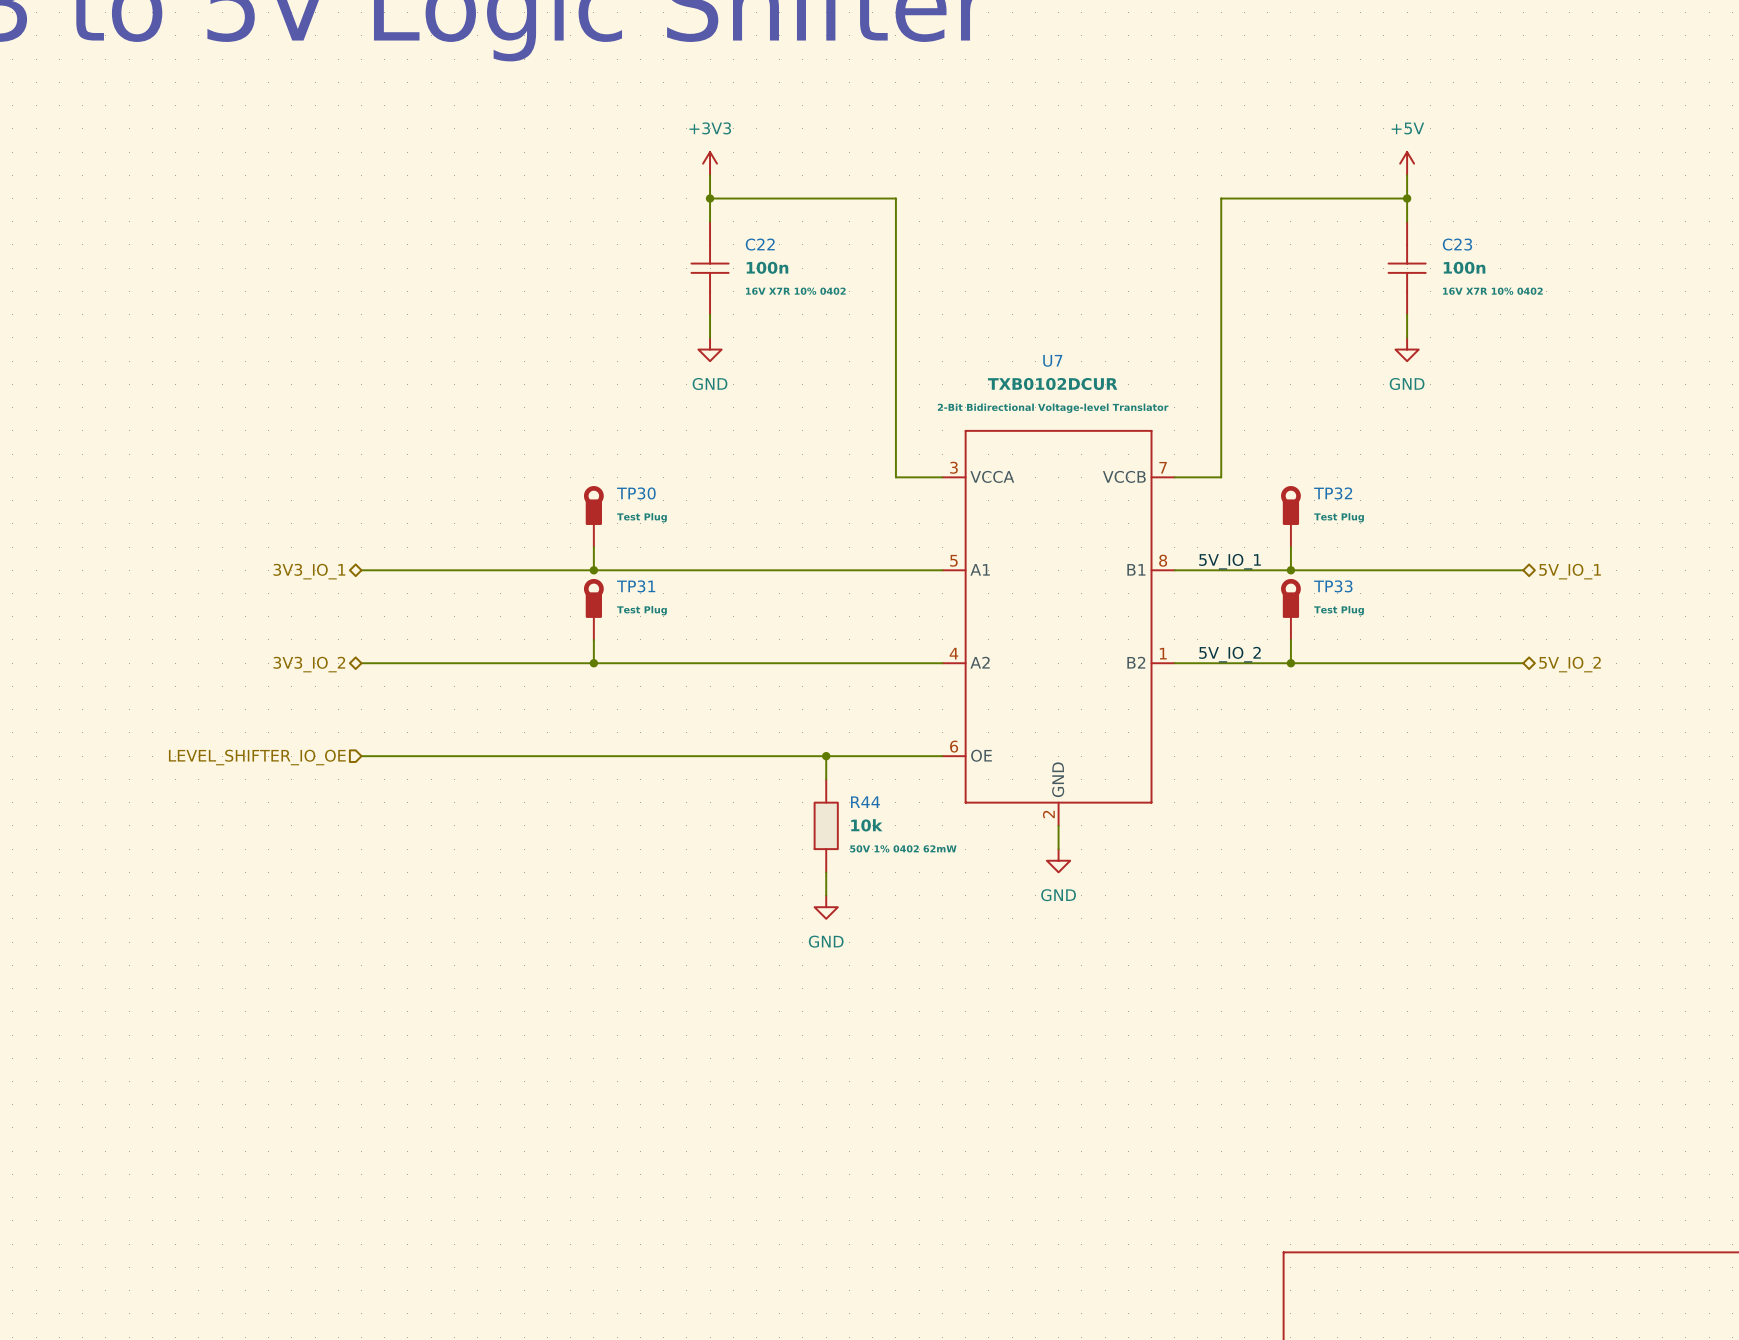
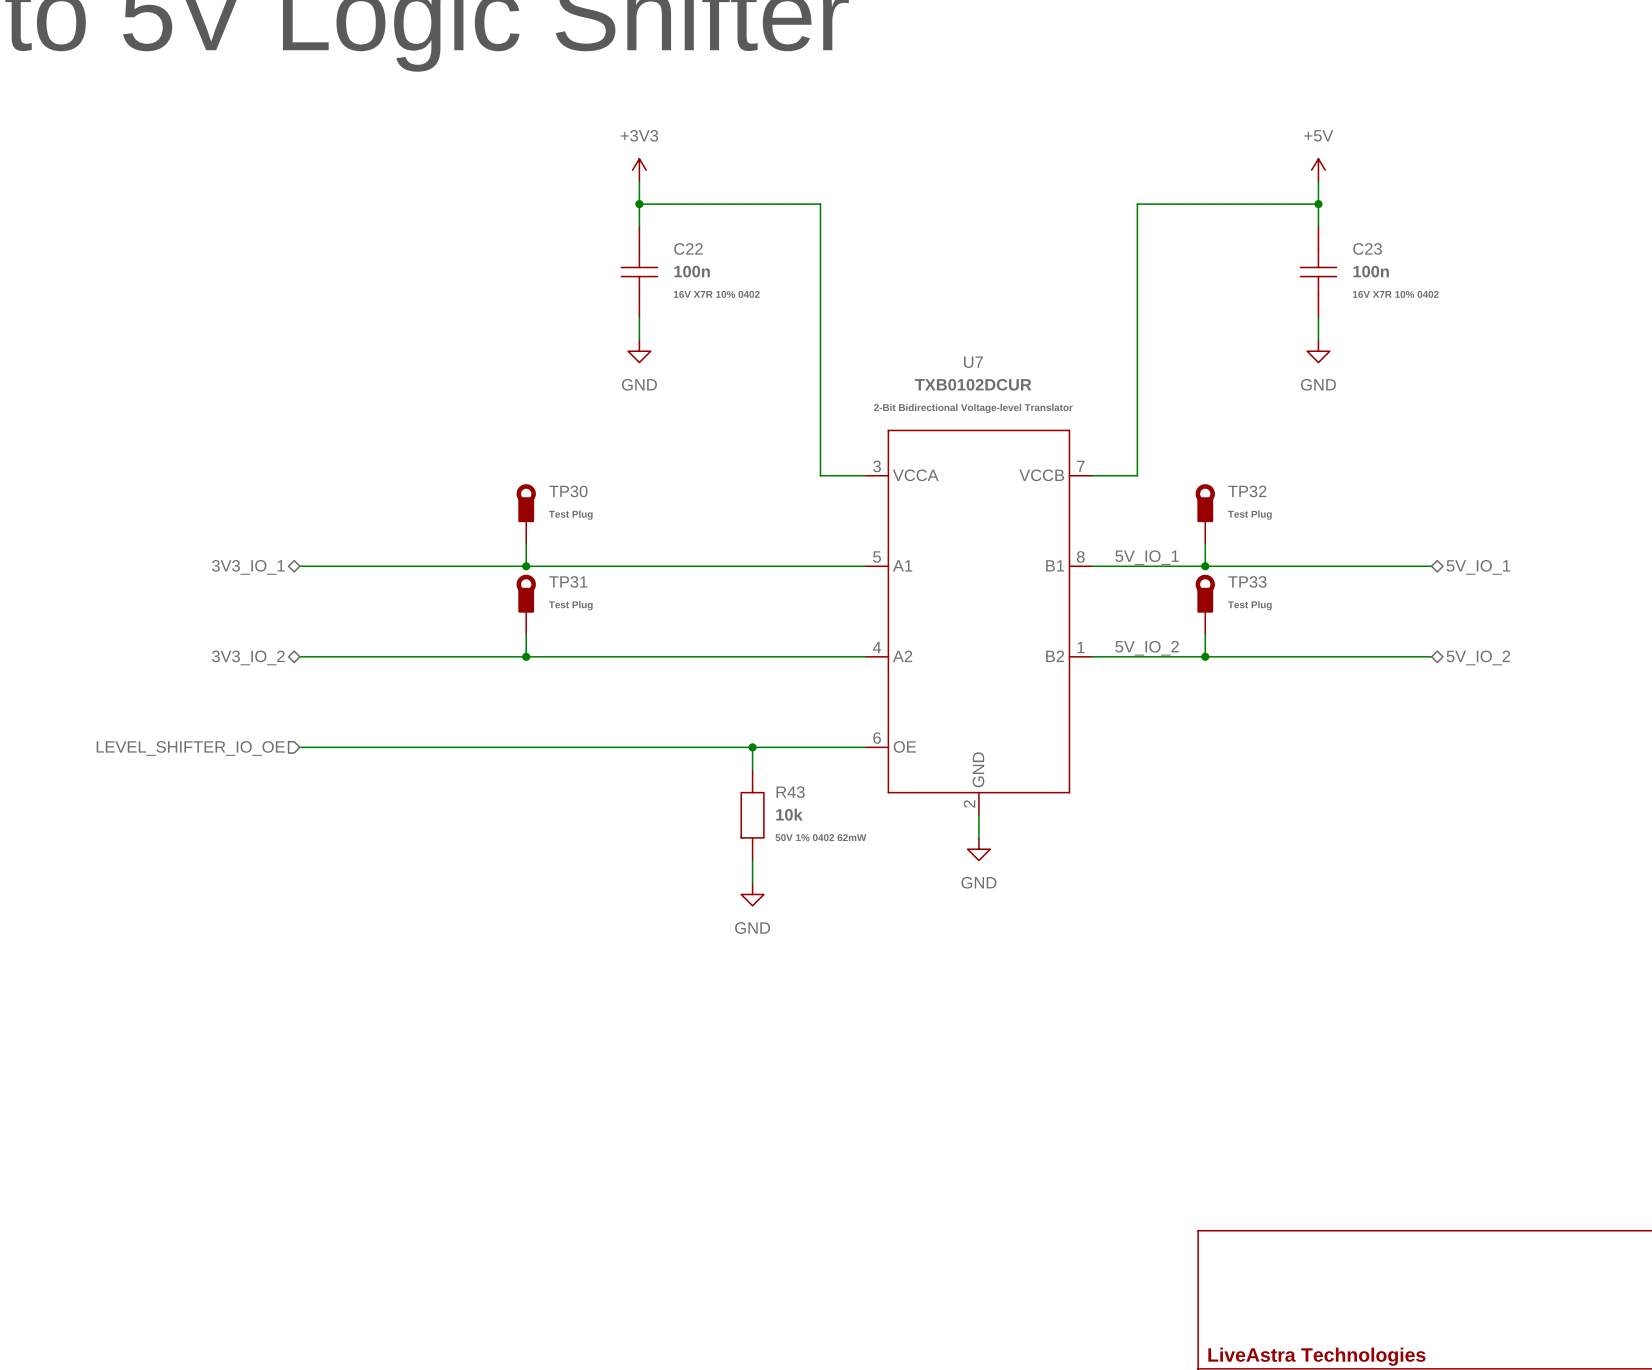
R44 name: R44 (865, 802) -> R43 (790, 792)

